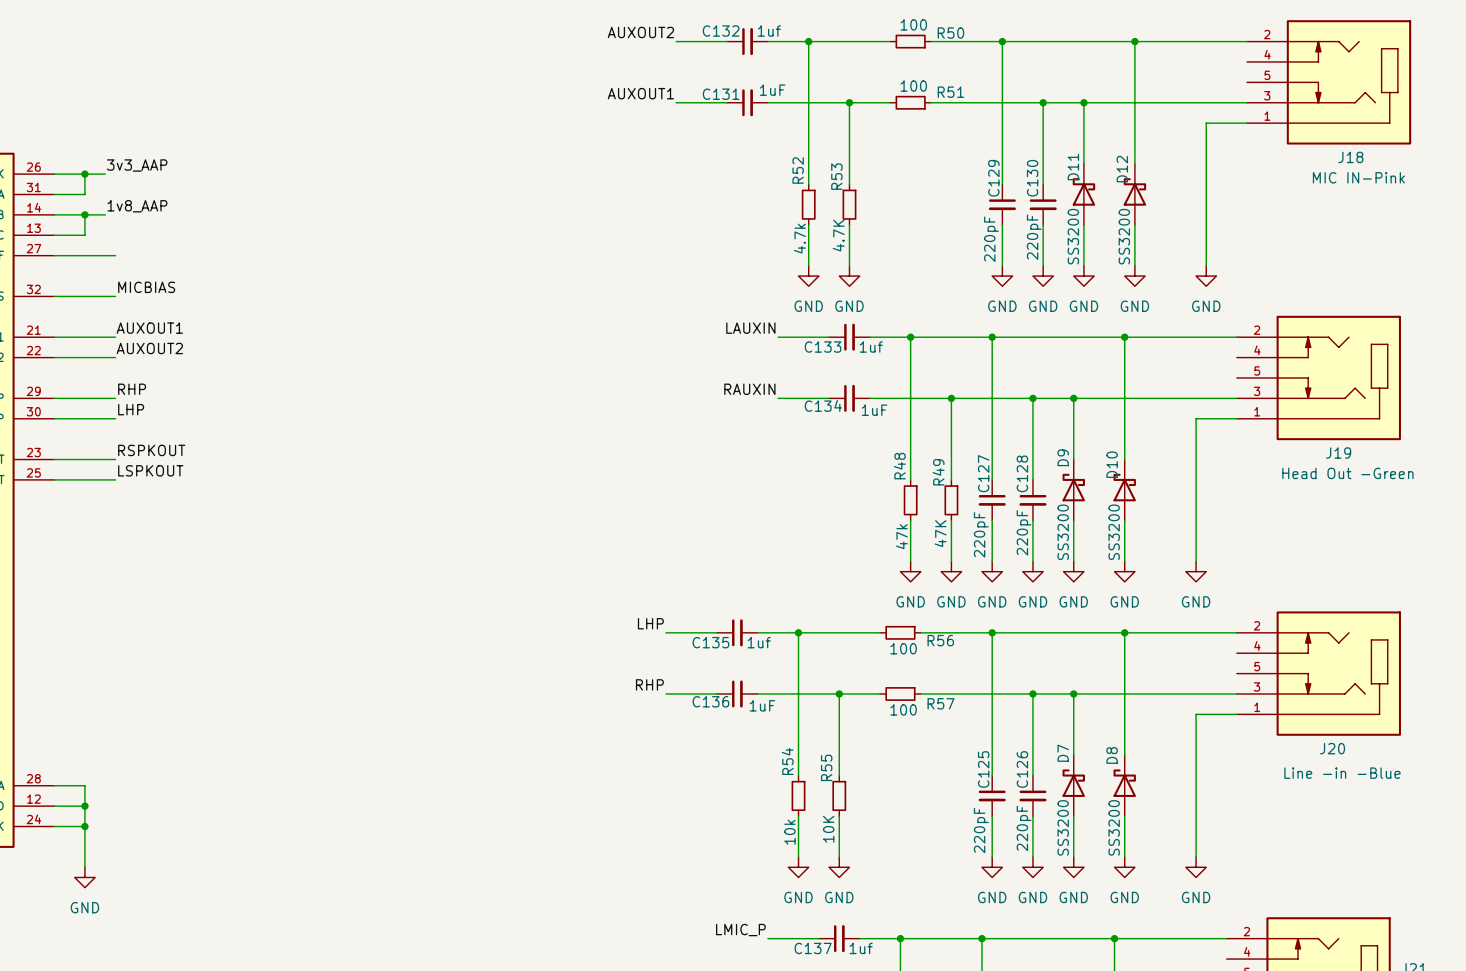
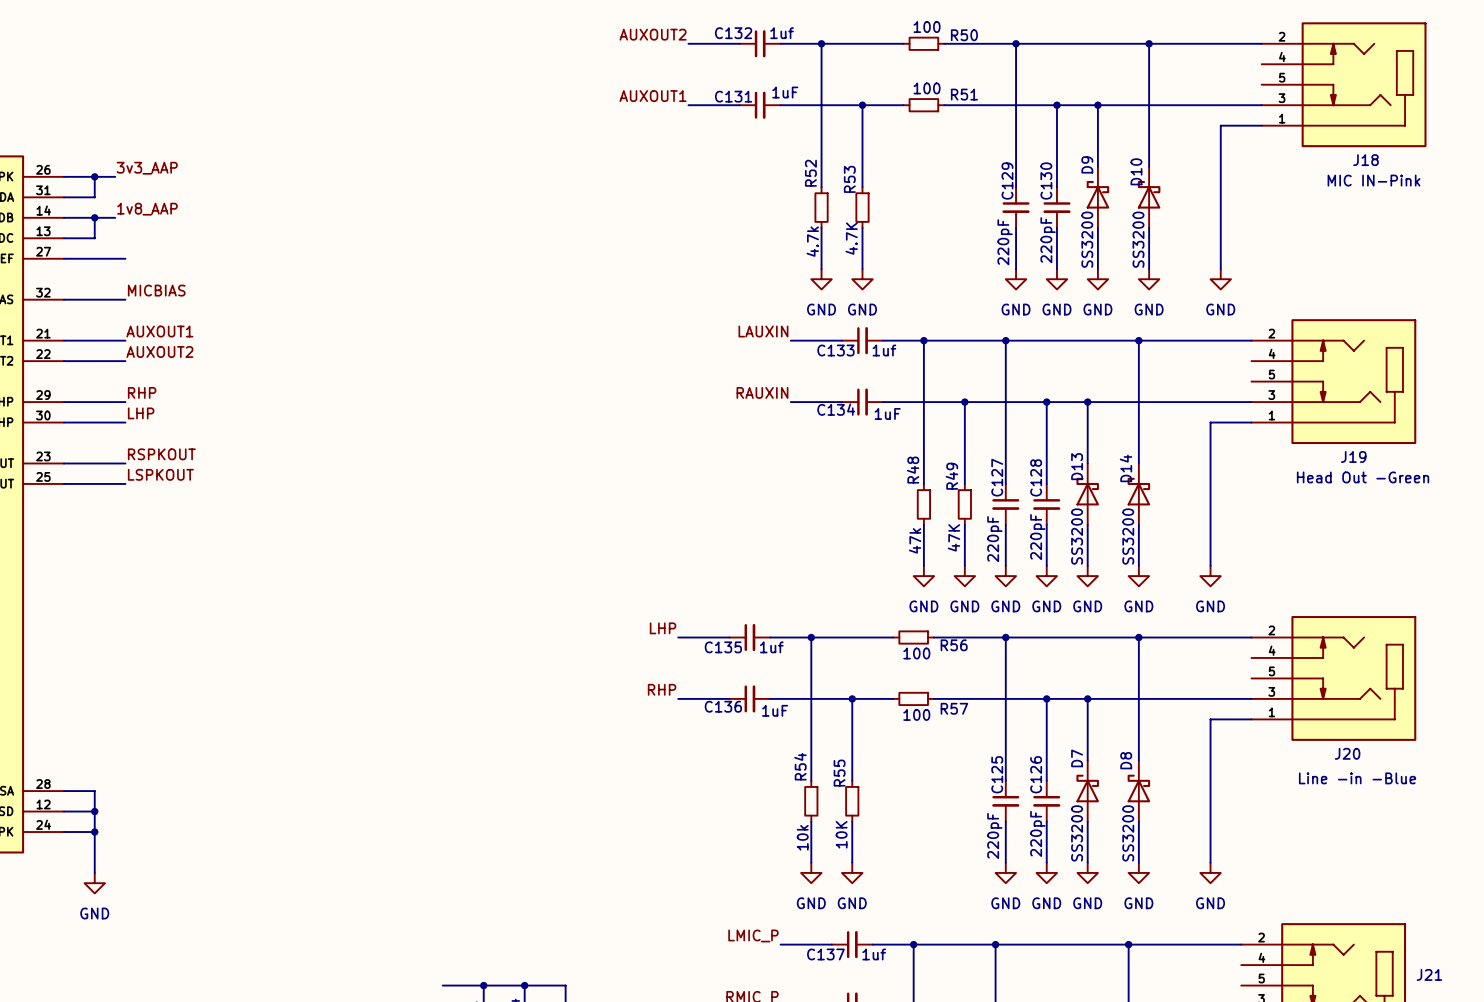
D11 name: D11 (1073, 167) -> D9 (1087, 164)
D12 name: D12 (1122, 169) -> D10 (1136, 171)
D9 name: D9 (1063, 457) -> D13 (1077, 466)
D10 name: D10 (1112, 464) -> D14 (1125, 468)

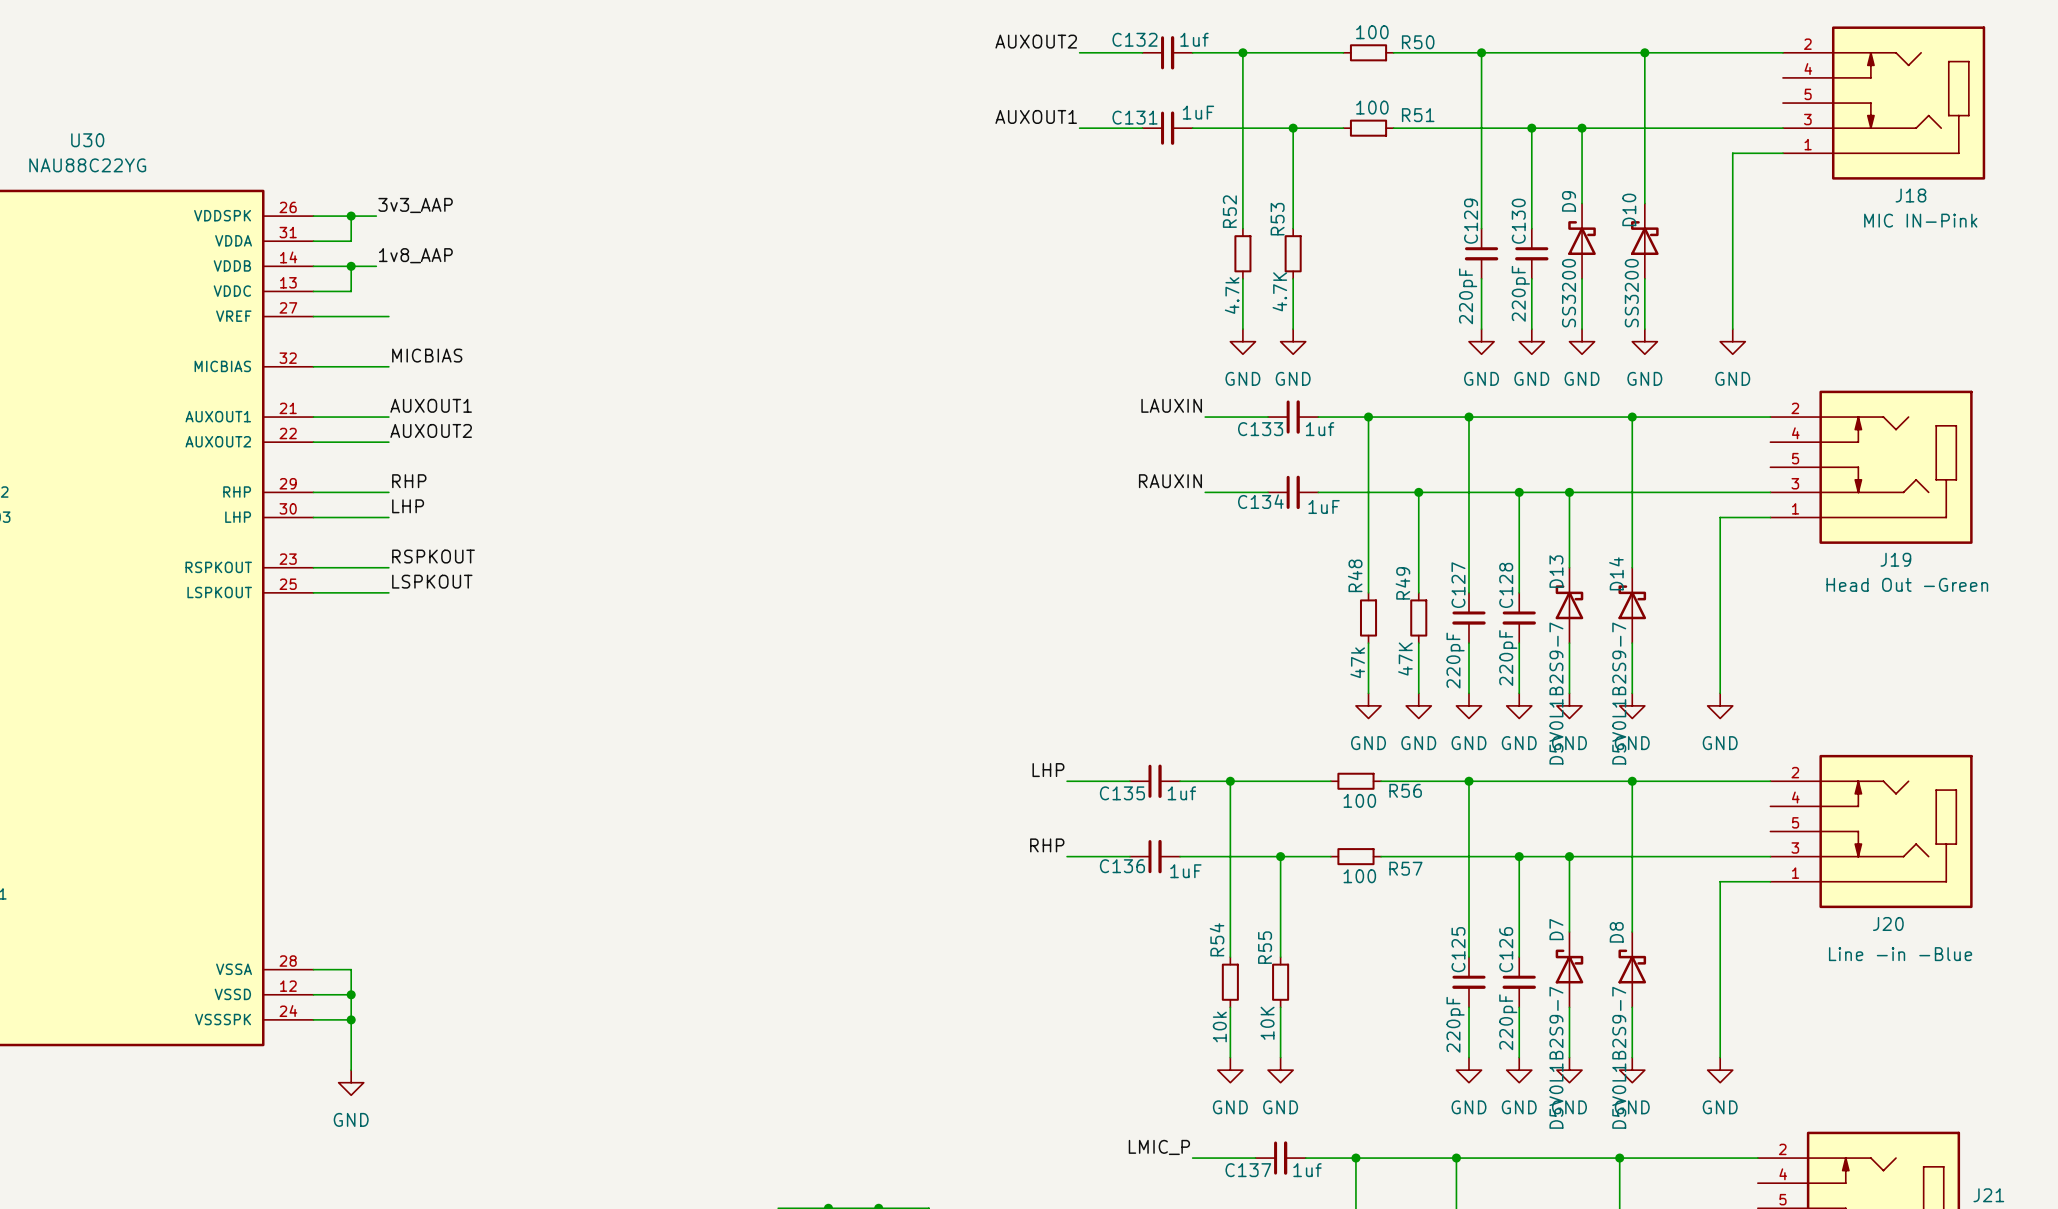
D13 value: SS3200 (1077, 536) -> D5V0L1B2S9-7 (1556, 693)
D14 value: SS3200 (1128, 536) -> D5V0L1B2S9-7 (1619, 693)
D7 value: SS3200 (1077, 833) -> D5V0L1B2S9-7 (1556, 1057)
D8 value: SS3200 (1128, 833) -> D5V0L1B2S9-7 (1619, 1057)

